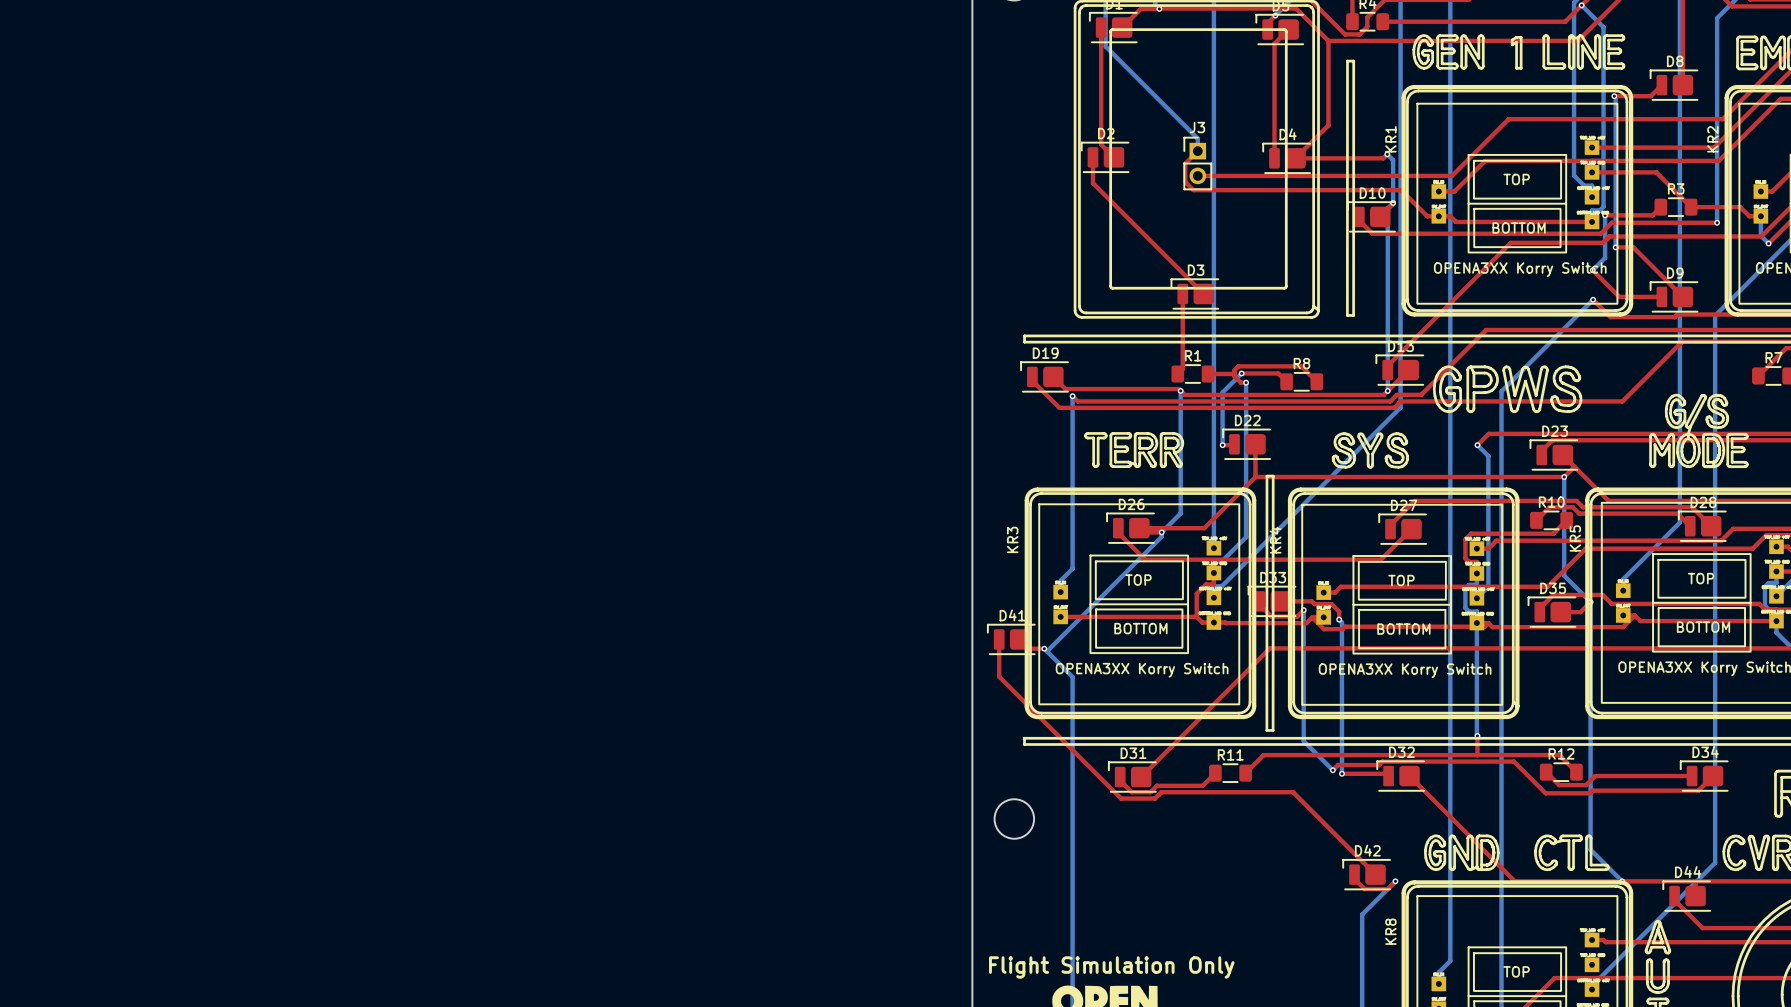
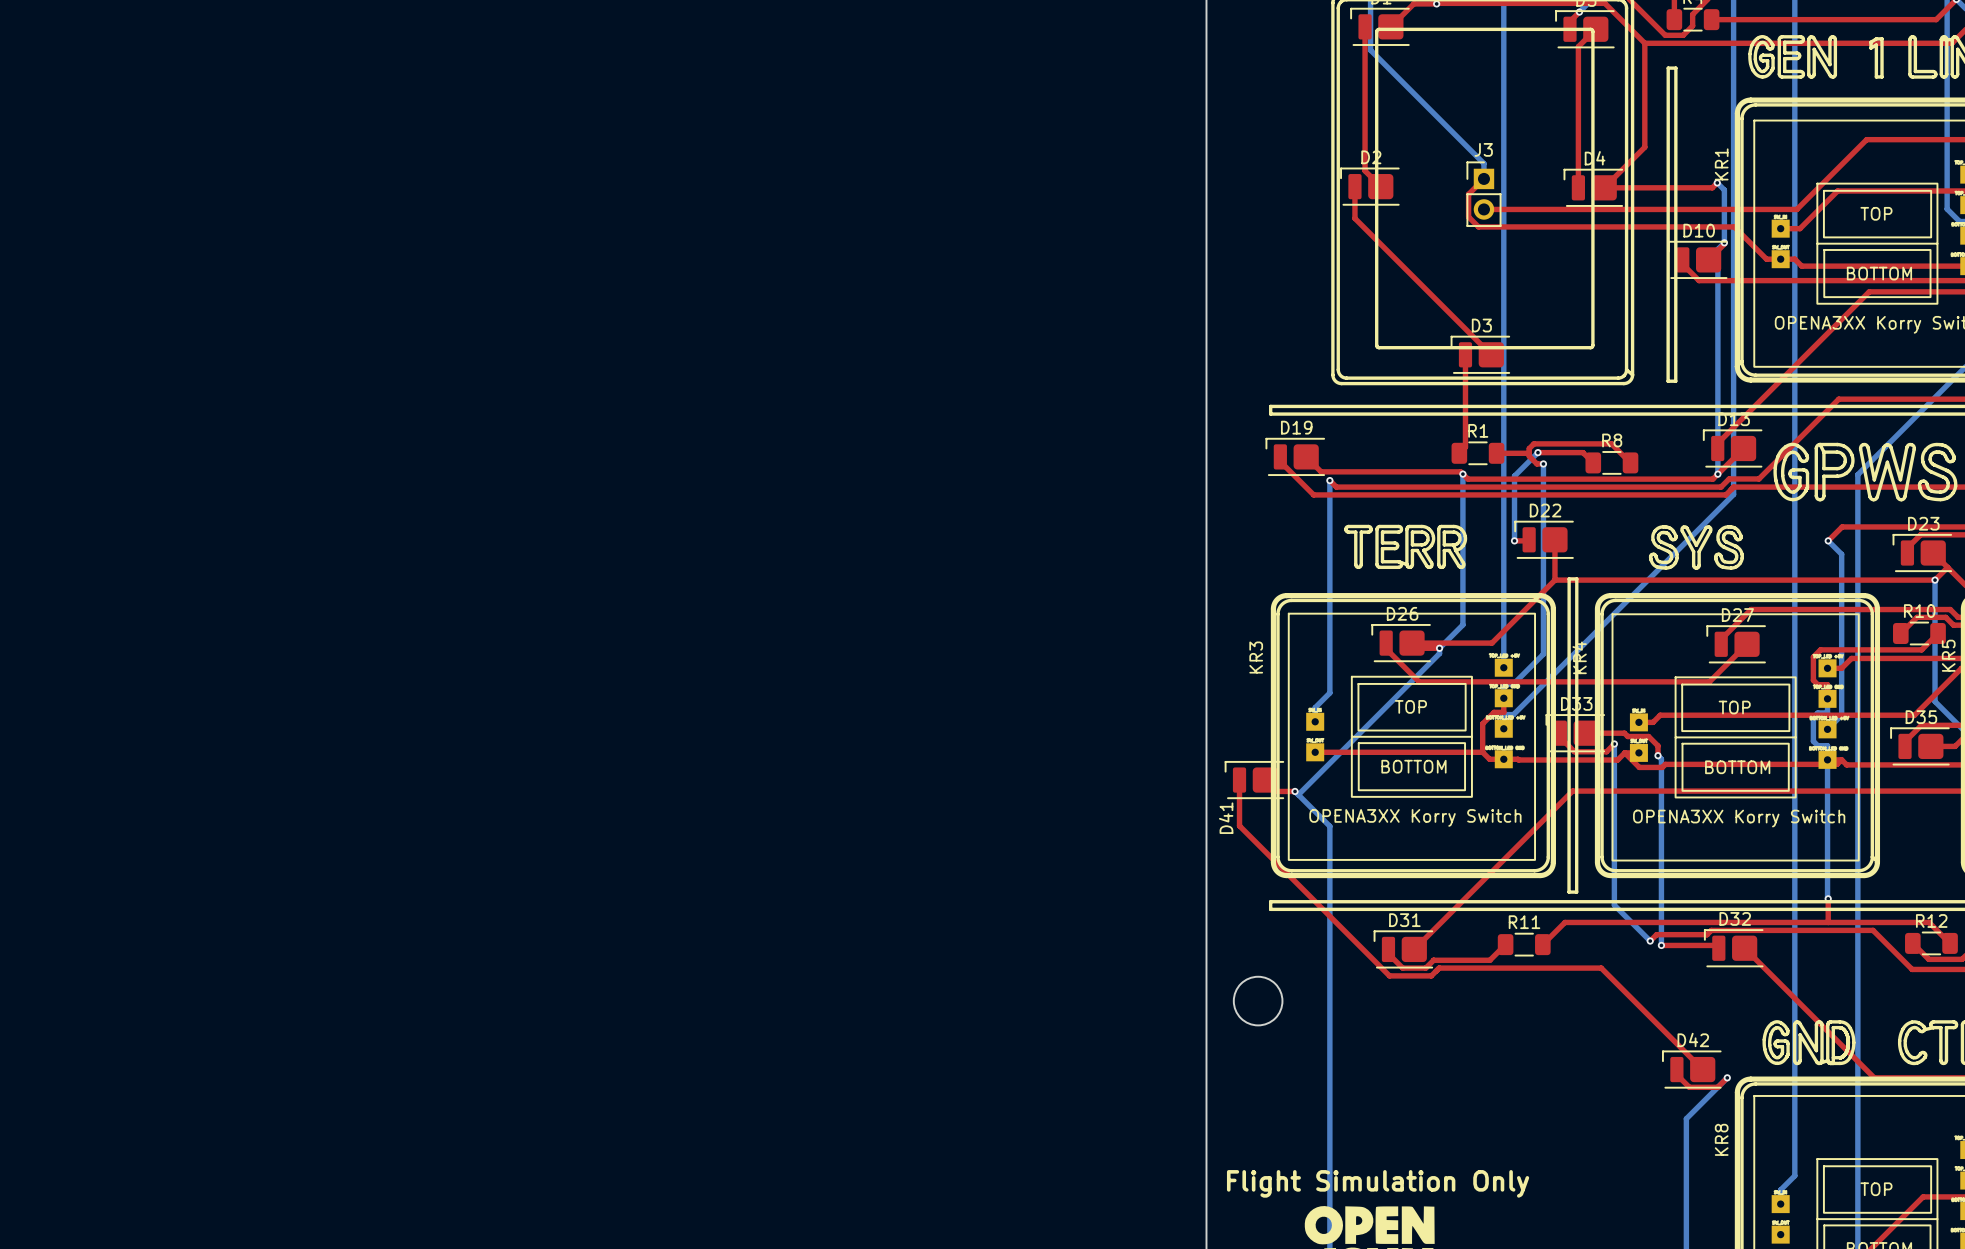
D41 name rotation: 0° (1012, 615) -> 90° counterclockwise (1226, 818)
D41 name position: D41 (1012, 615) -> D41 (1226, 818)

